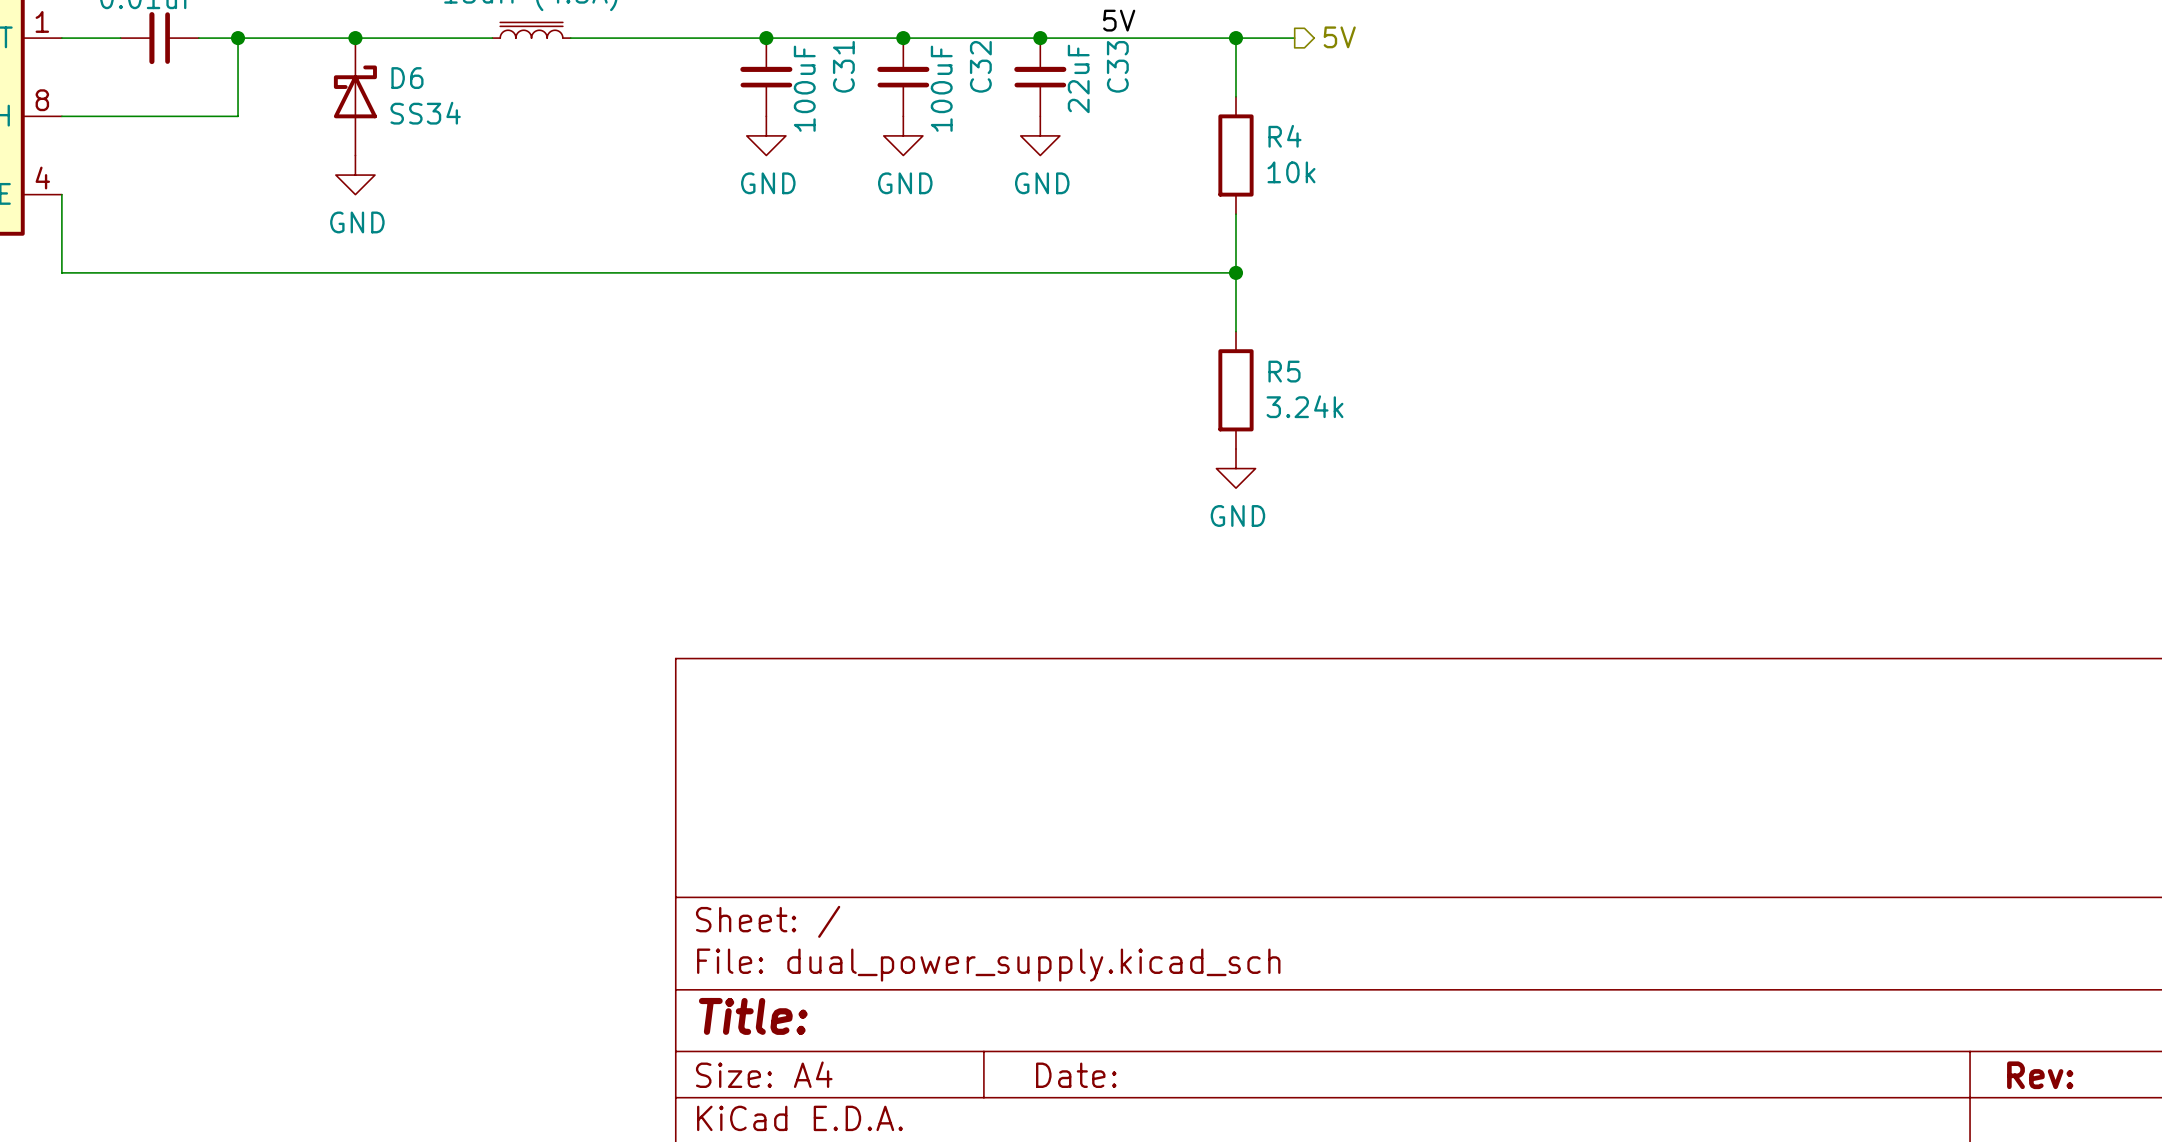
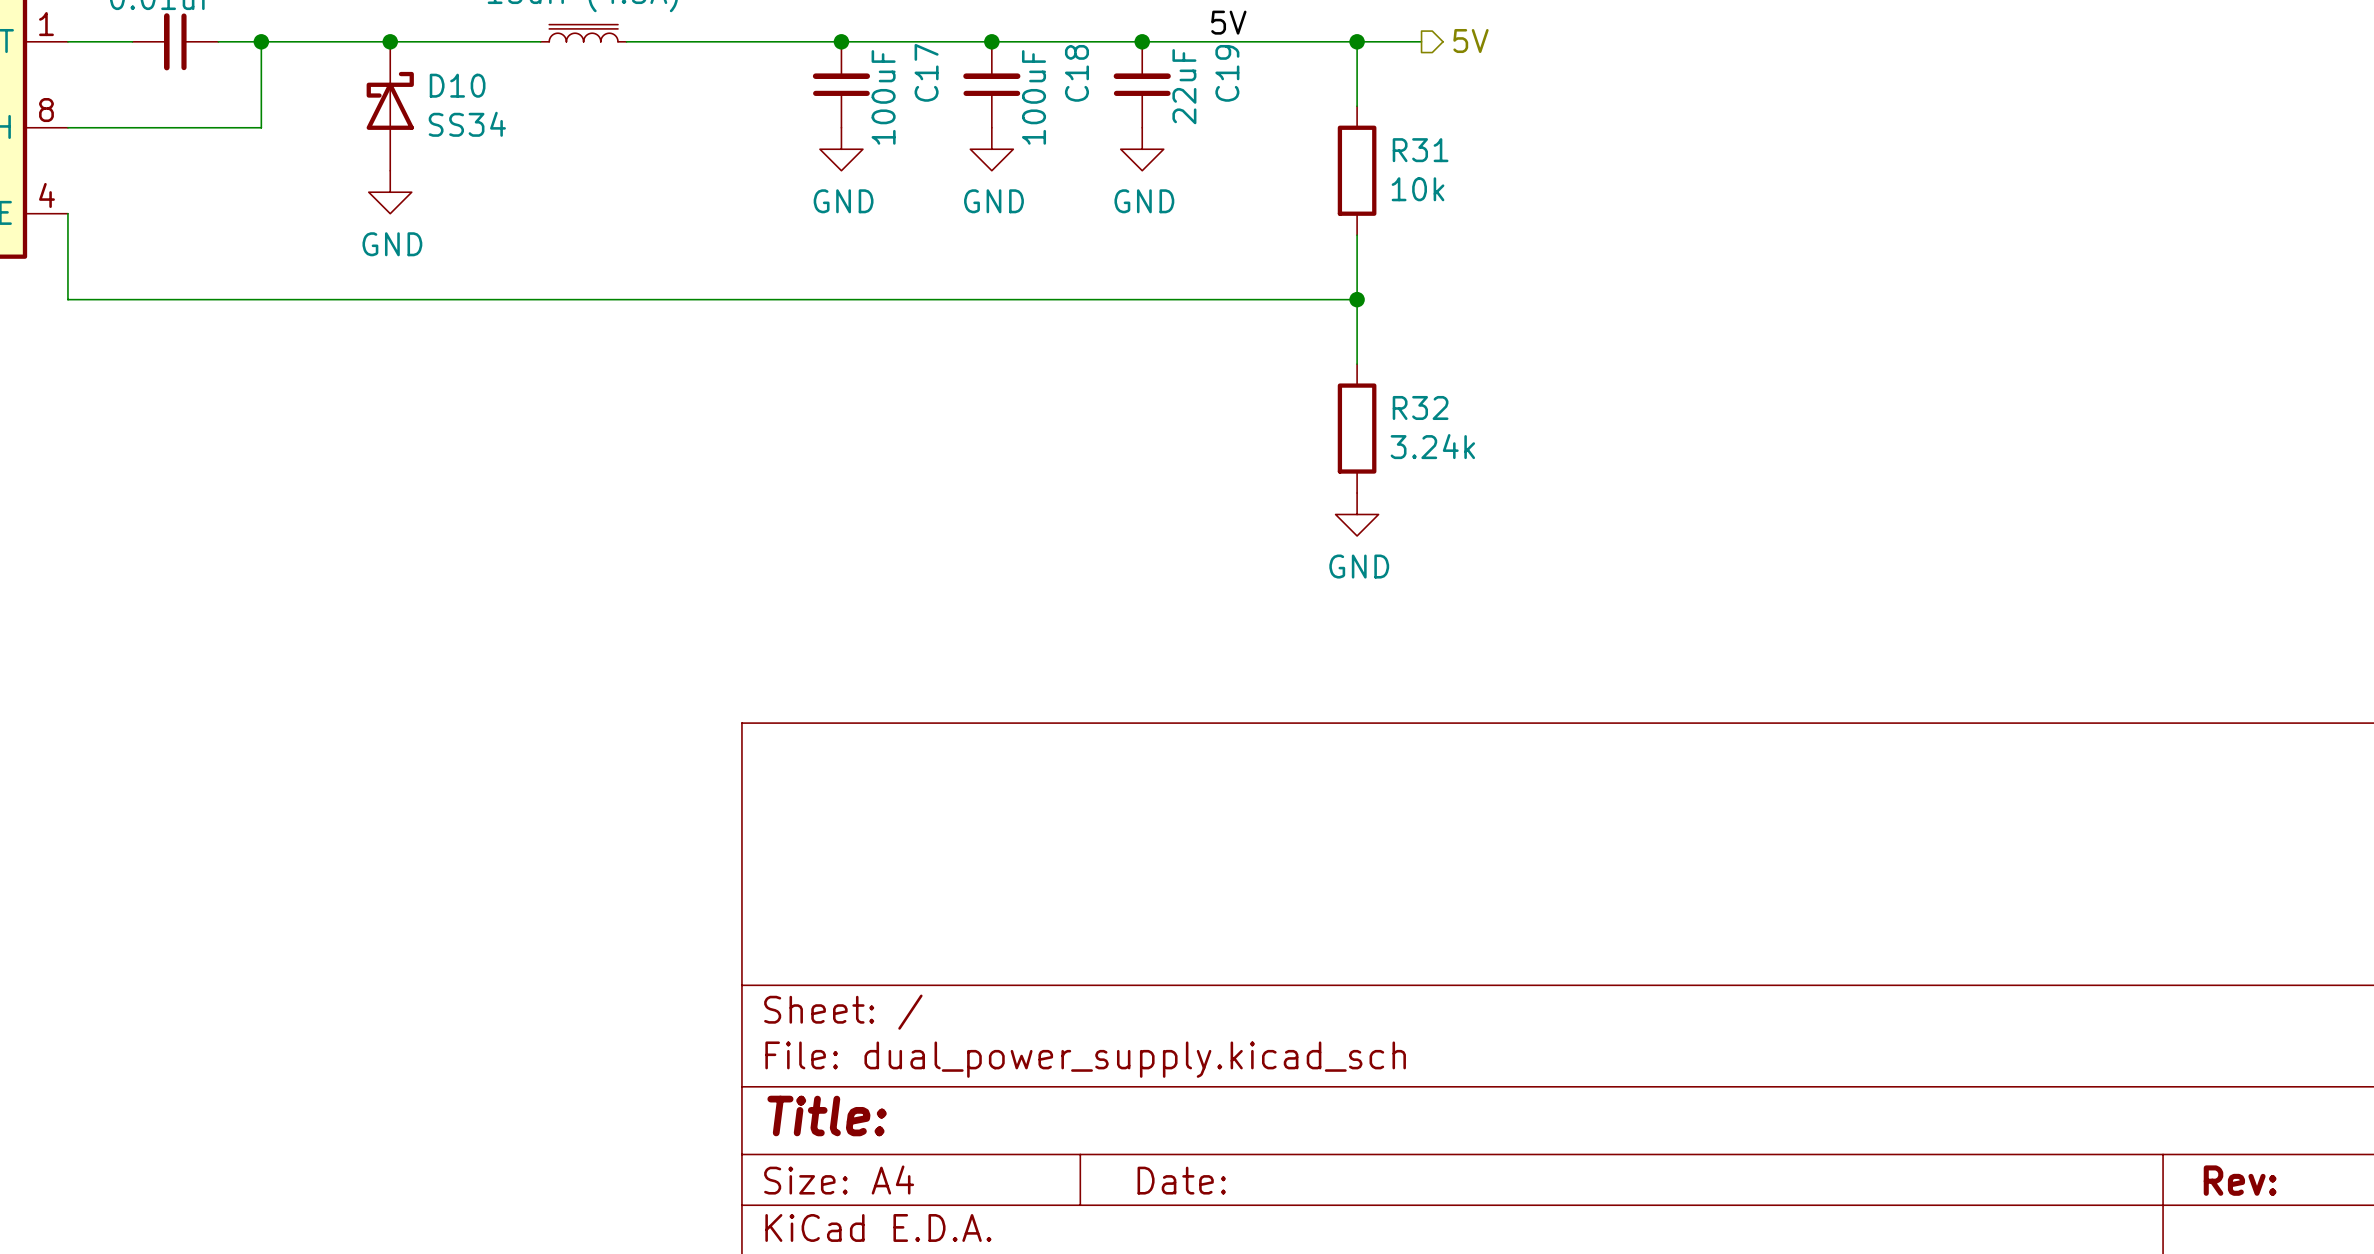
C31 name: C31 (843, 66) -> C17 (926, 72)
C32 name: C32 (980, 66) -> C18 (1076, 73)
C33 name: C33 (1117, 66) -> C19 (1227, 73)
D6 name: D6 (407, 78) -> D10 (457, 85)
R4 name: R4 (1284, 136) -> R31 (1420, 150)
R5 name: R5 (1284, 371) -> R32 (1420, 407)

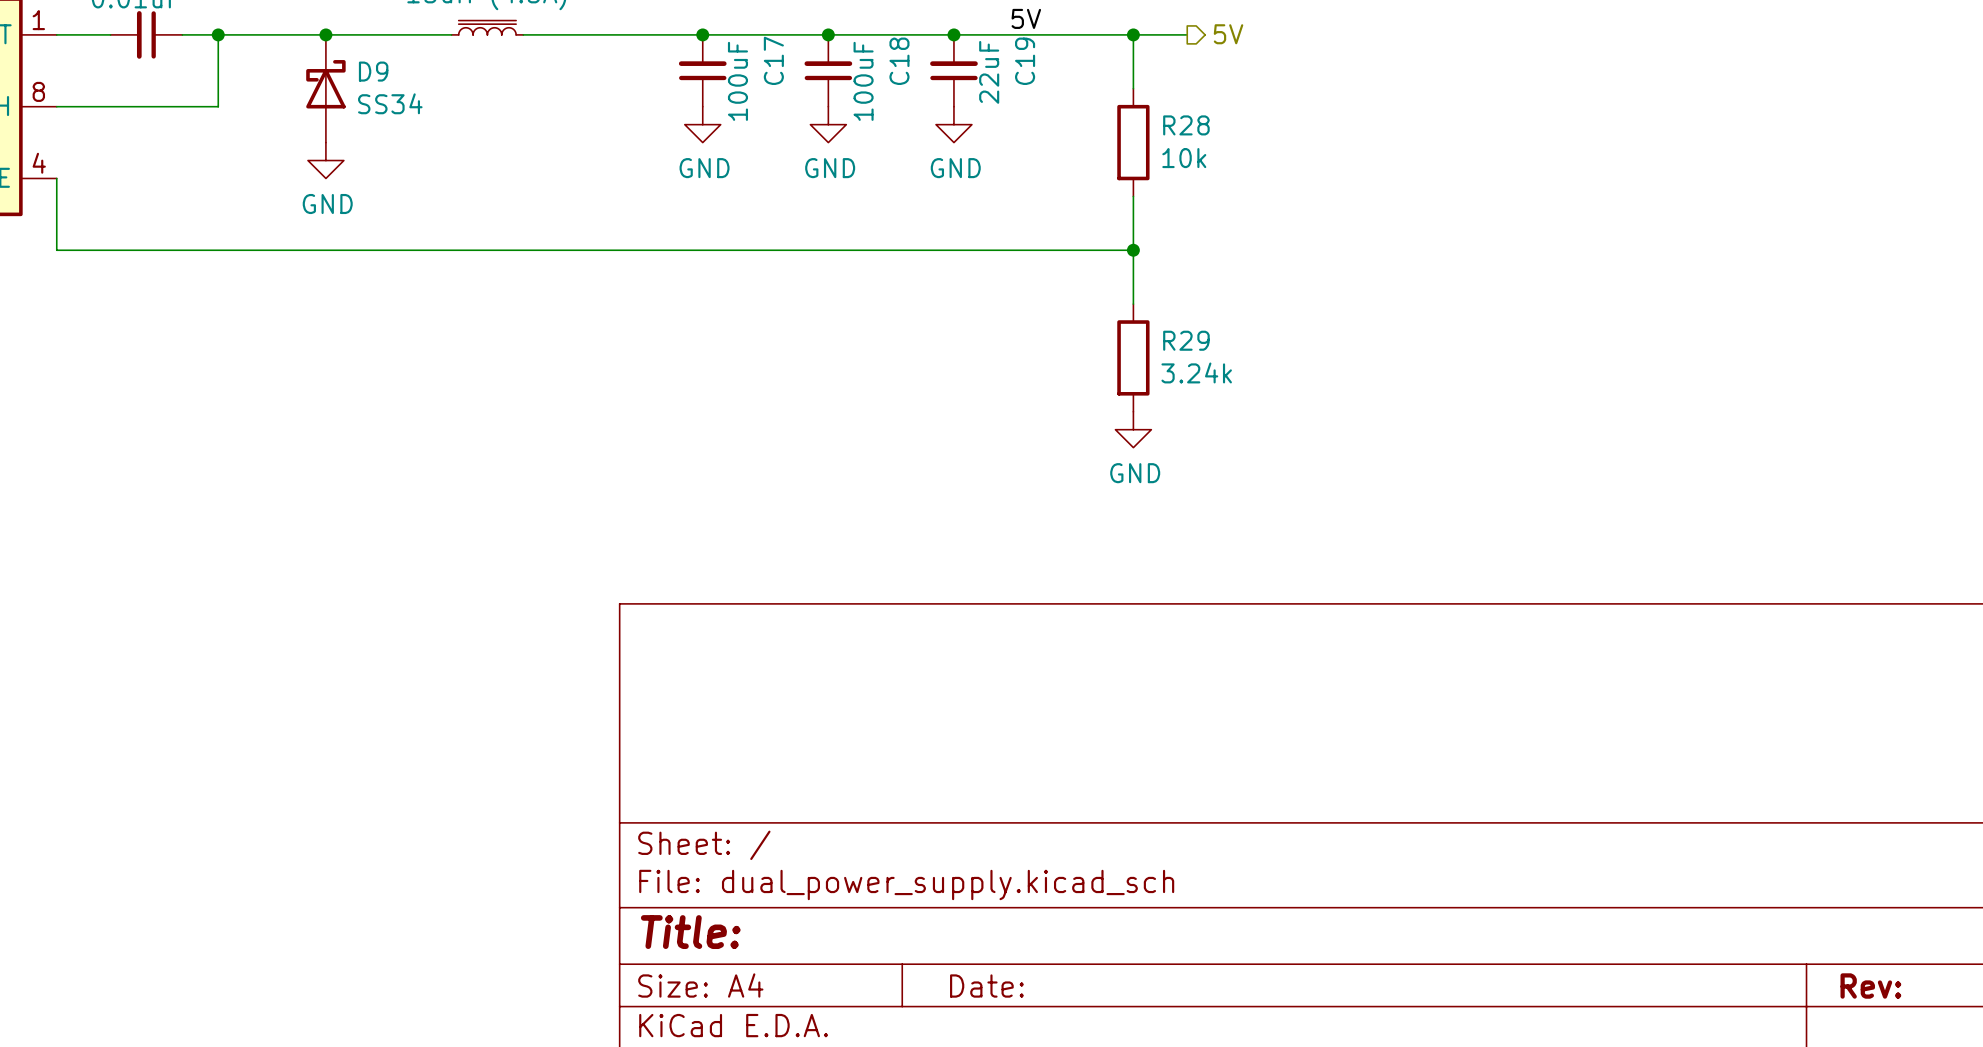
D10 name: D10 (457, 85) -> D9 (373, 71)
R31 name: R31 (1420, 150) -> R28 (1186, 125)
R32 name: R32 (1420, 407) -> R29 (1186, 340)

